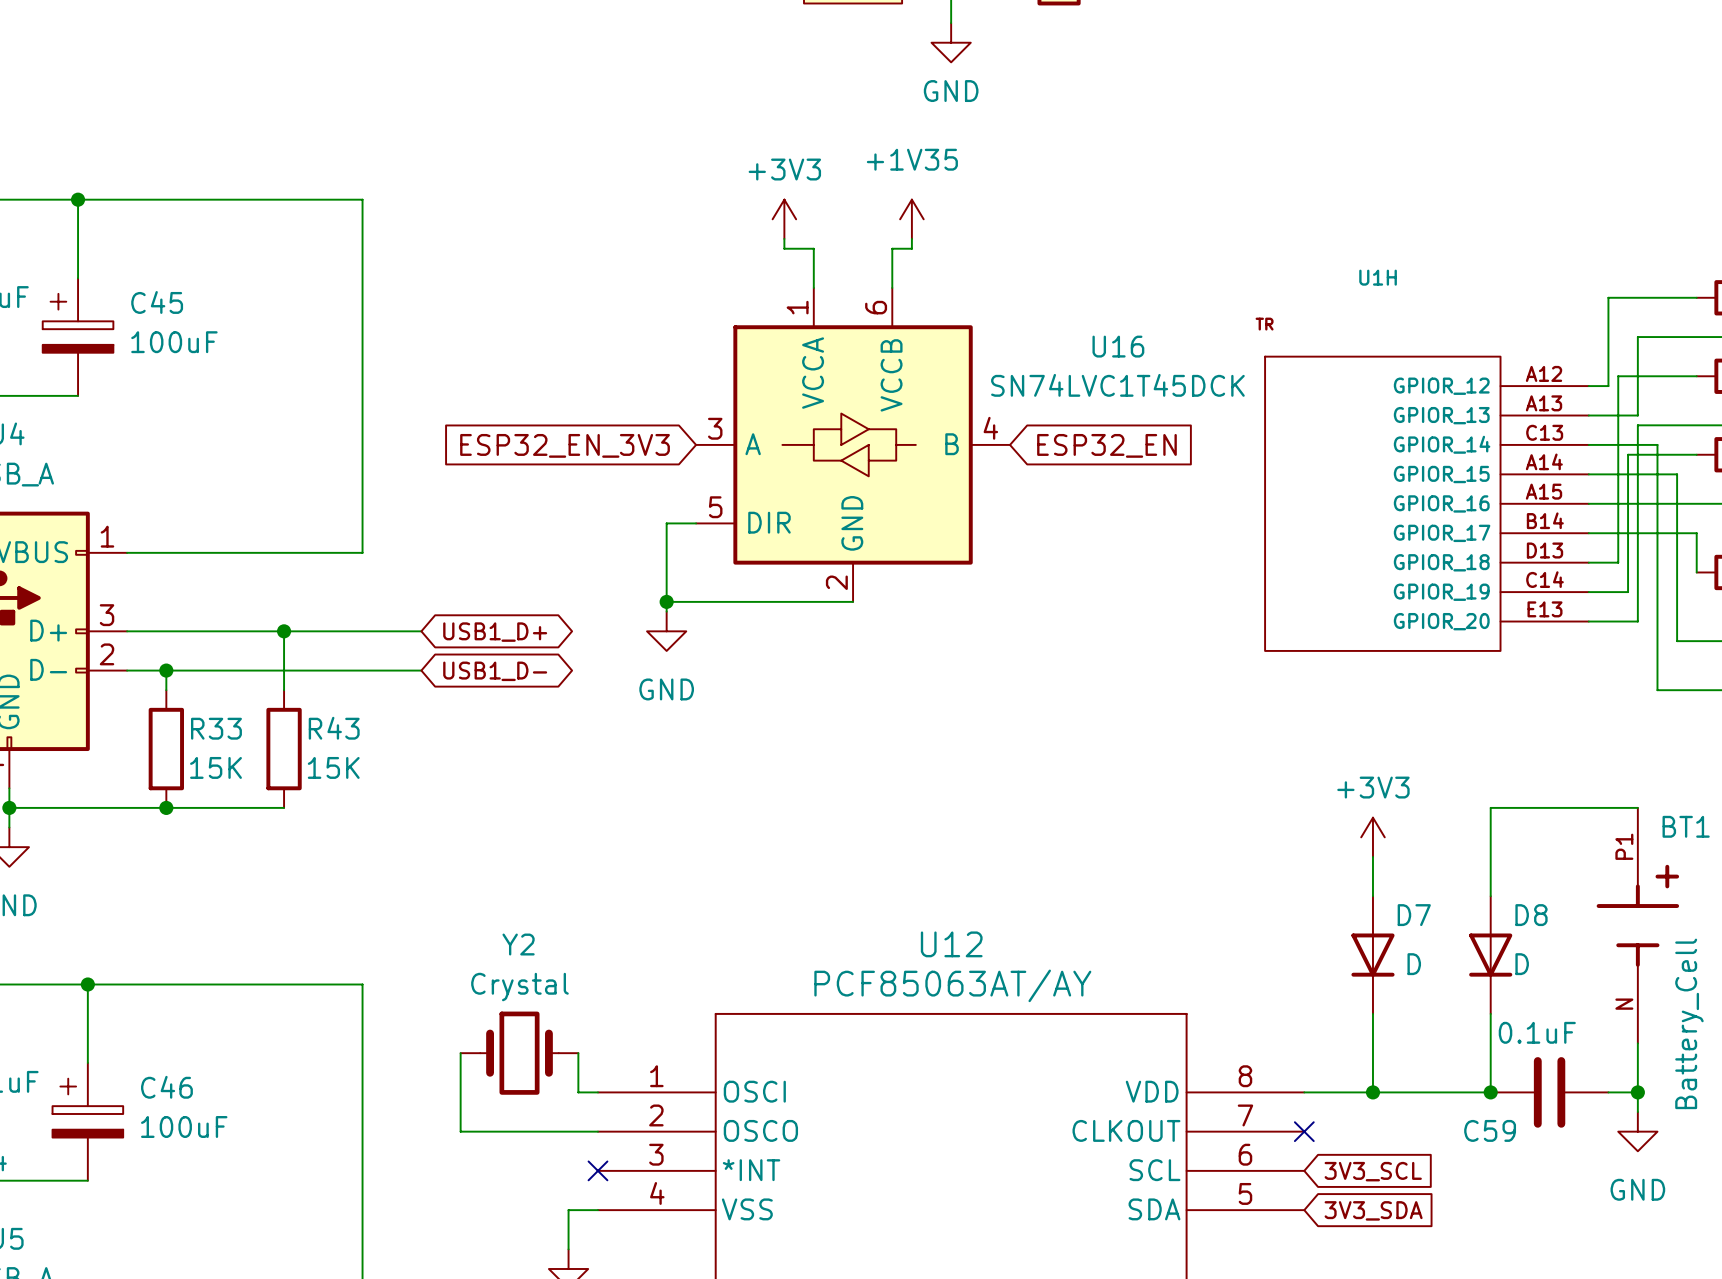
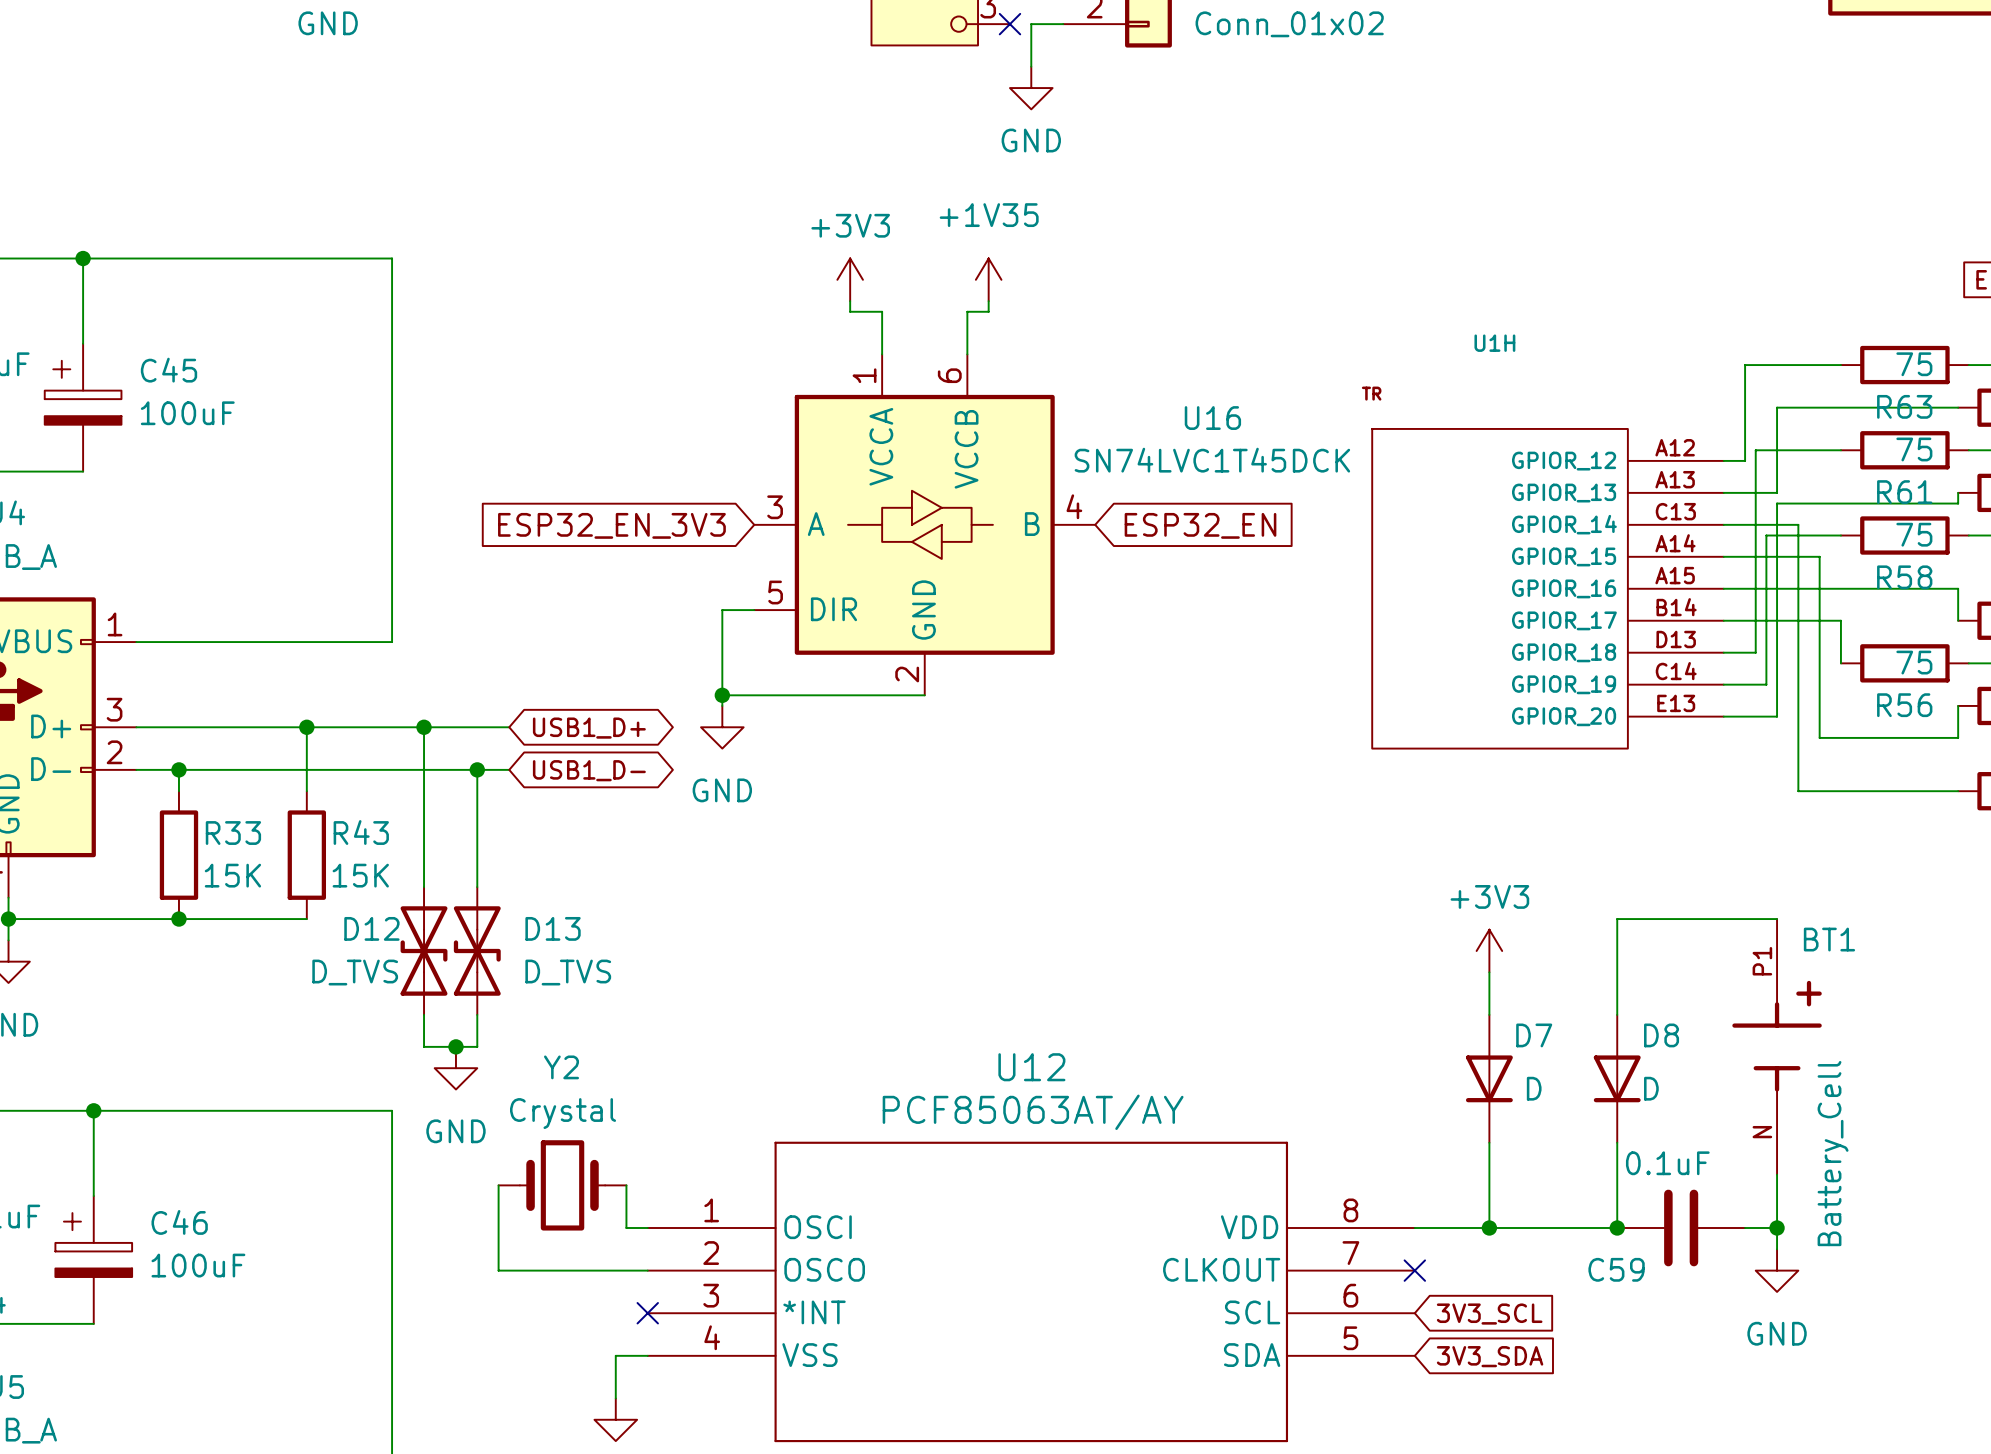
wire: none -> (424, 727) (424, 887)
junction: none -> (424, 727)
wire: none -> (455, 727) (509, 727)
global label position: USB1_D+ (495, 632) -> USB1_D+ (589, 728)
wire: none -> (455, 769) (509, 769)
wire: none -> (477, 769) (477, 887)
junction: none -> (477, 769)
global label position: USB1_D- (495, 671) -> USB1_D- (589, 770)
D12: none -> D_TVS (424, 951)
D13: none -> D_TVS (477, 951)
wire: none -> (424, 1014) (424, 1046) (477, 1046) (477, 1014)
junction: none -> (455, 1046)
power symbol: none -> GND (455, 1068)

